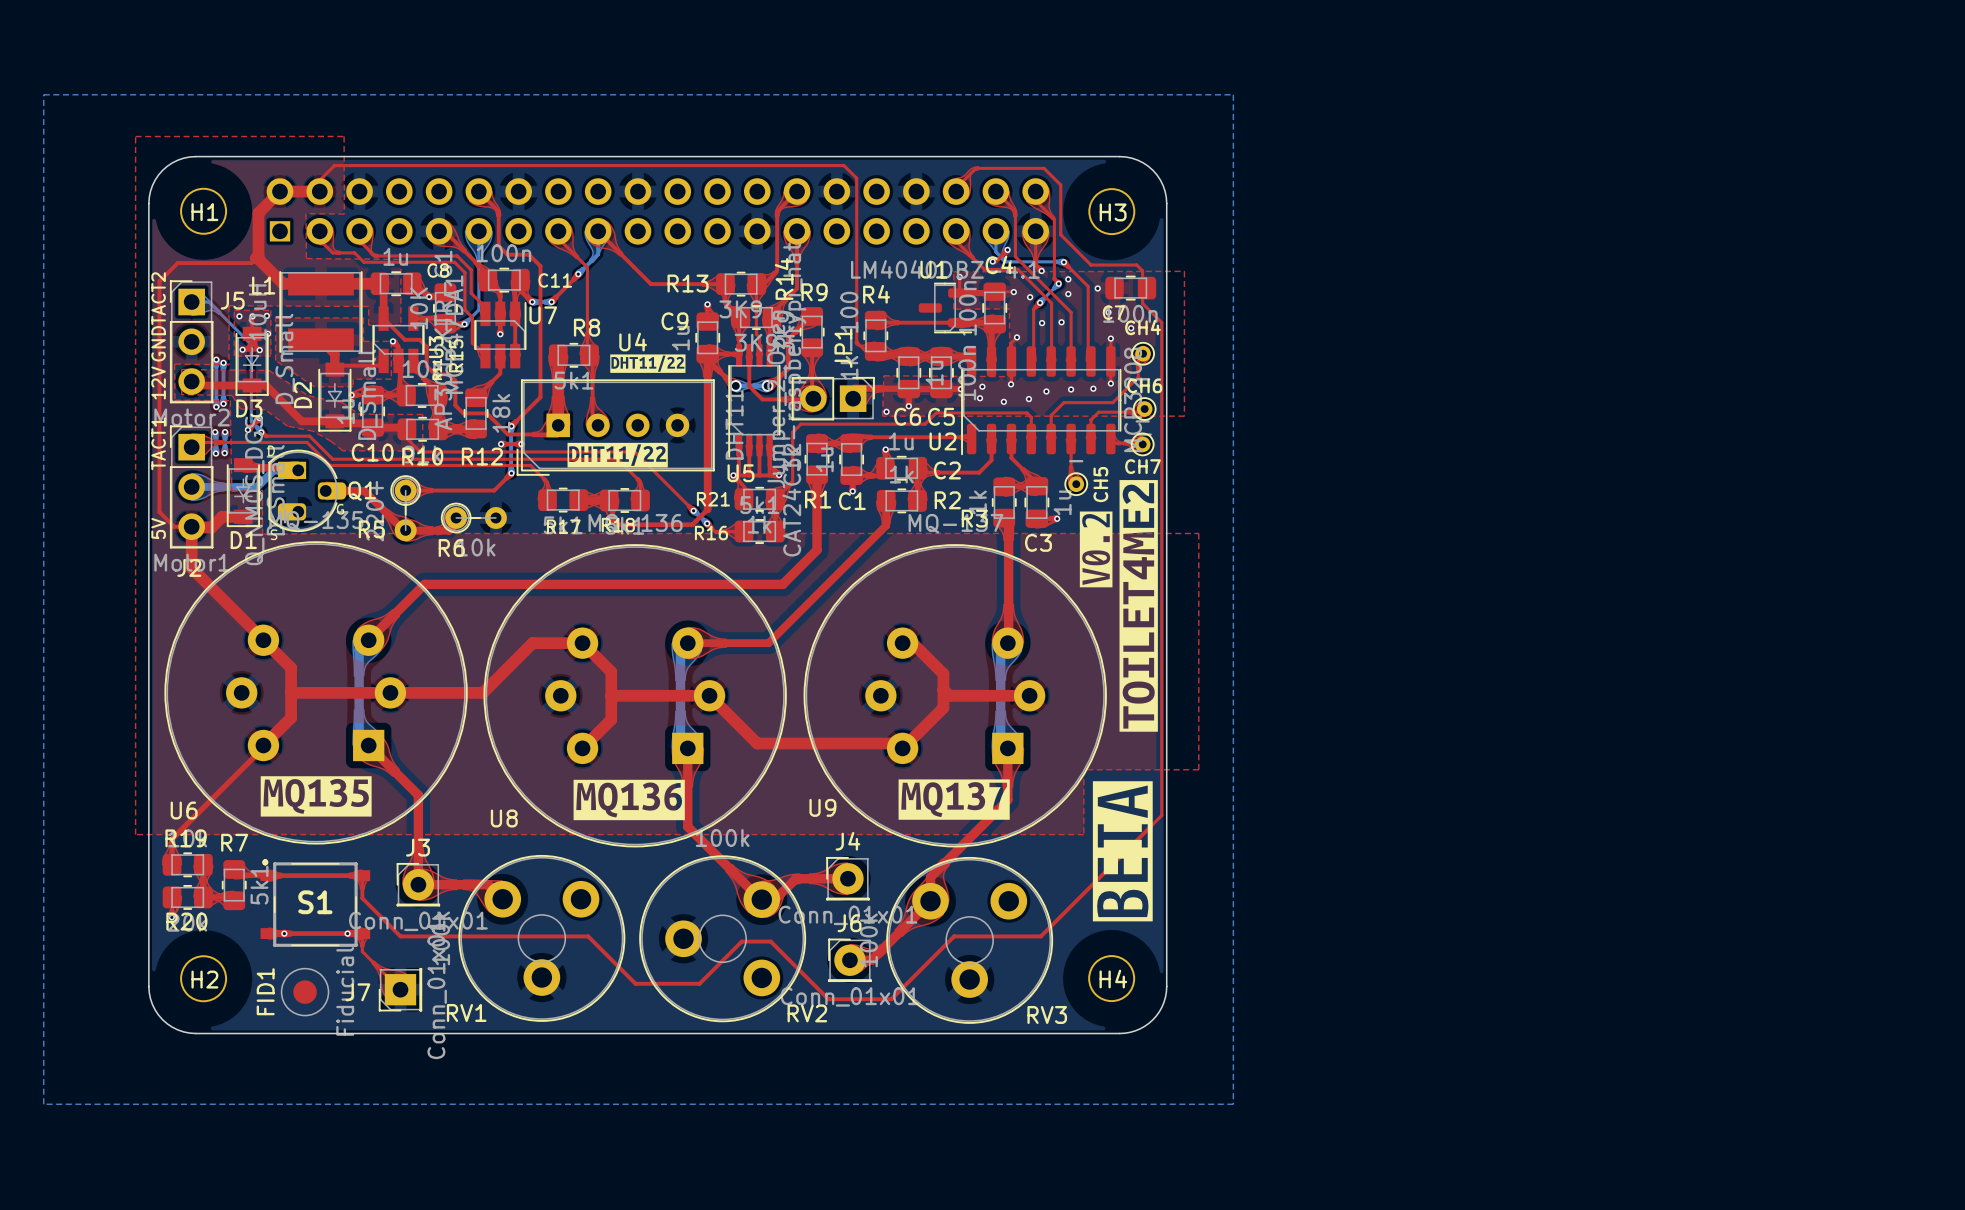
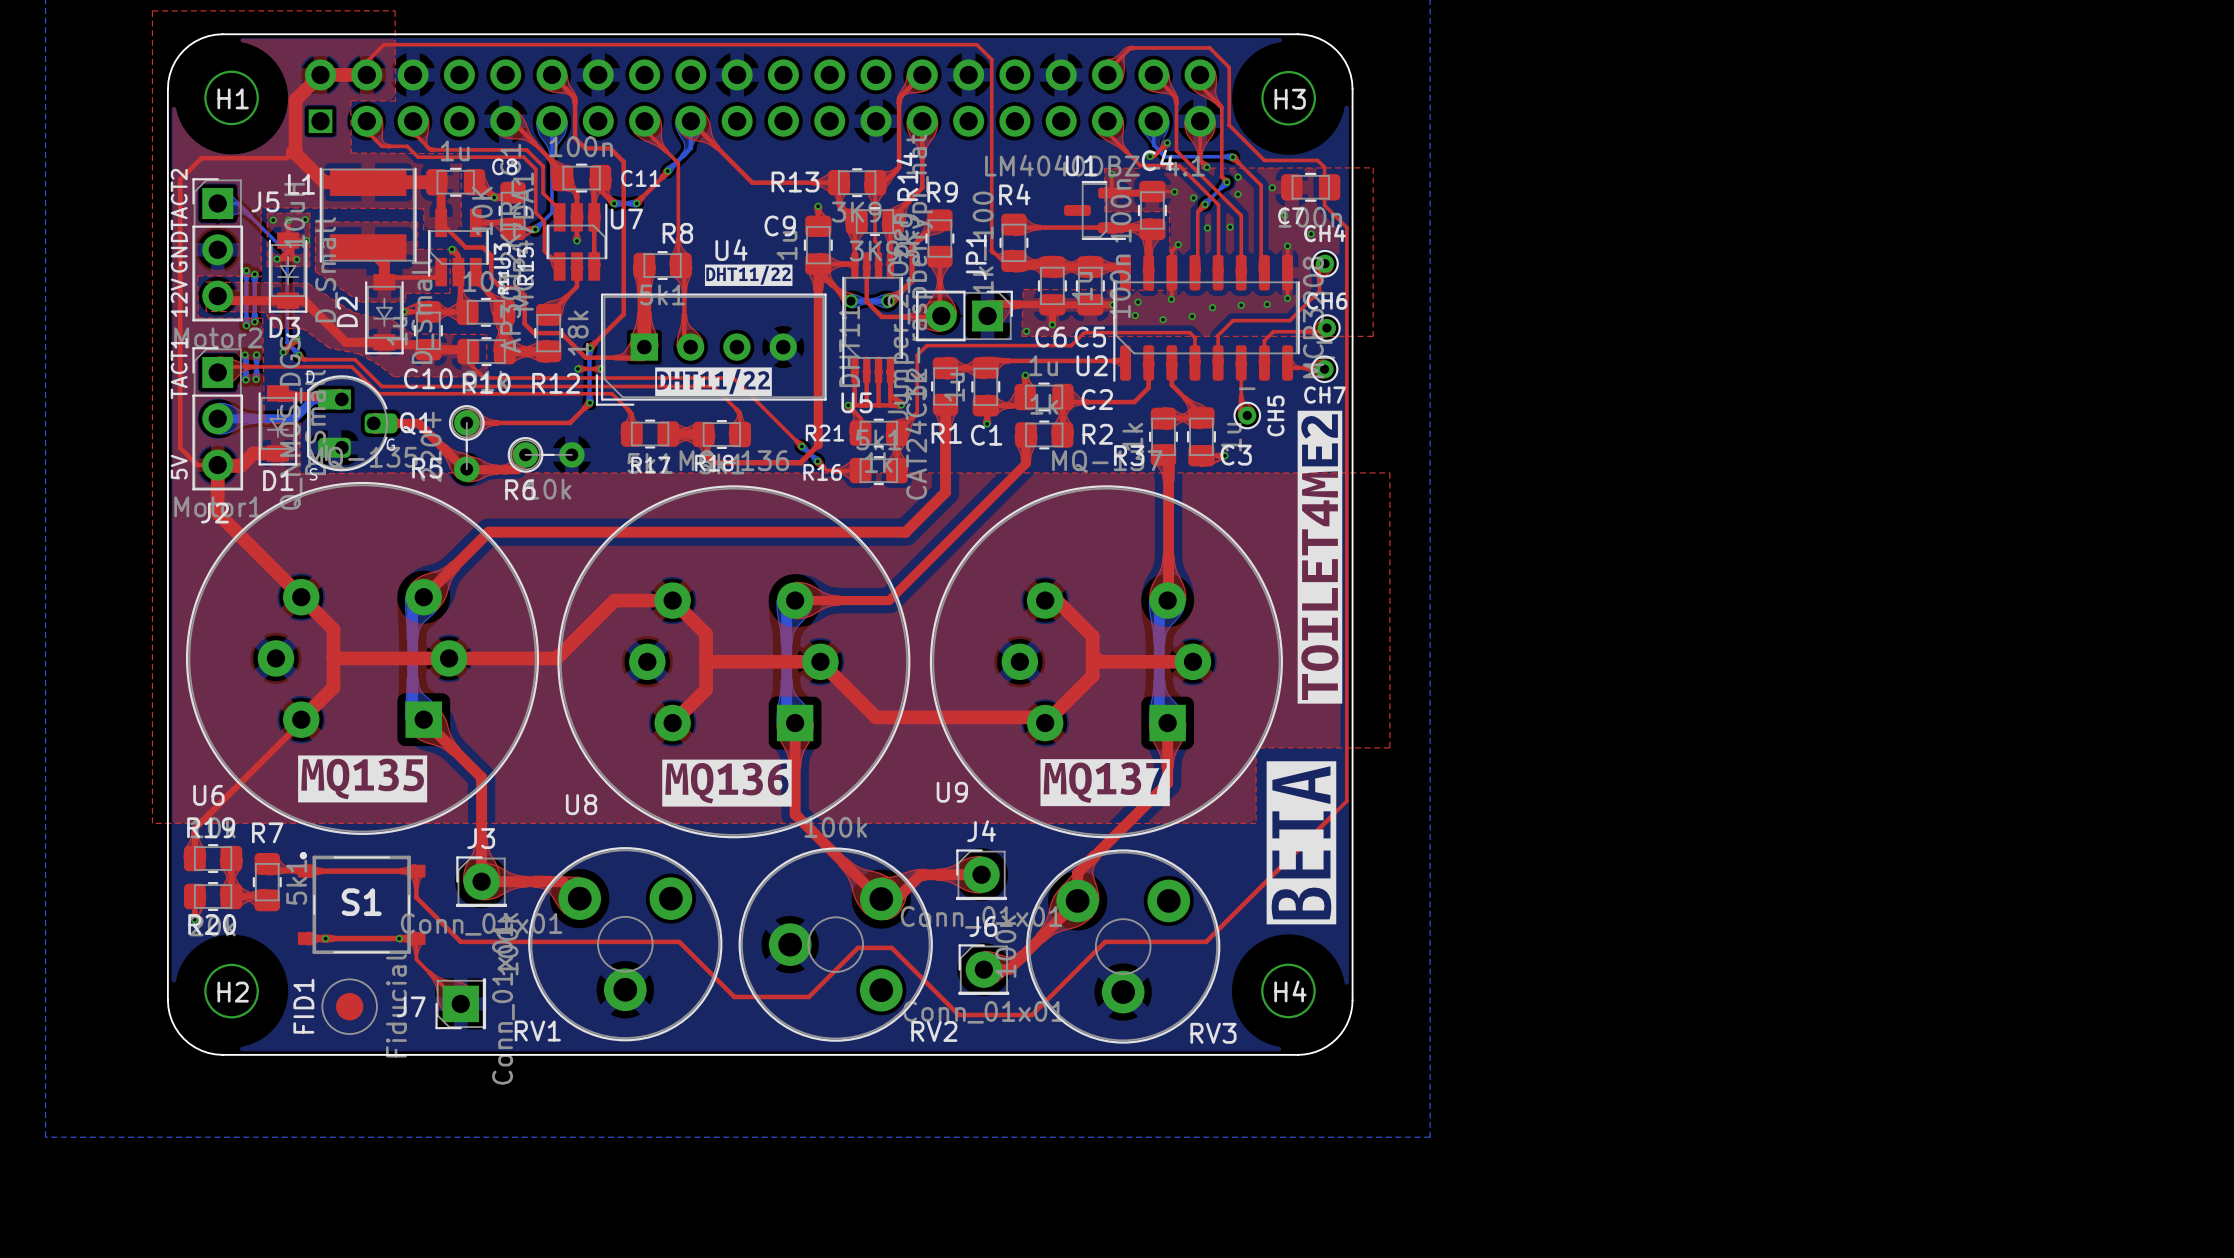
drawing: [1079, 511, 1113, 588] -> none
C3 name position: C3 (1038, 542) -> C3 (1236, 455)

